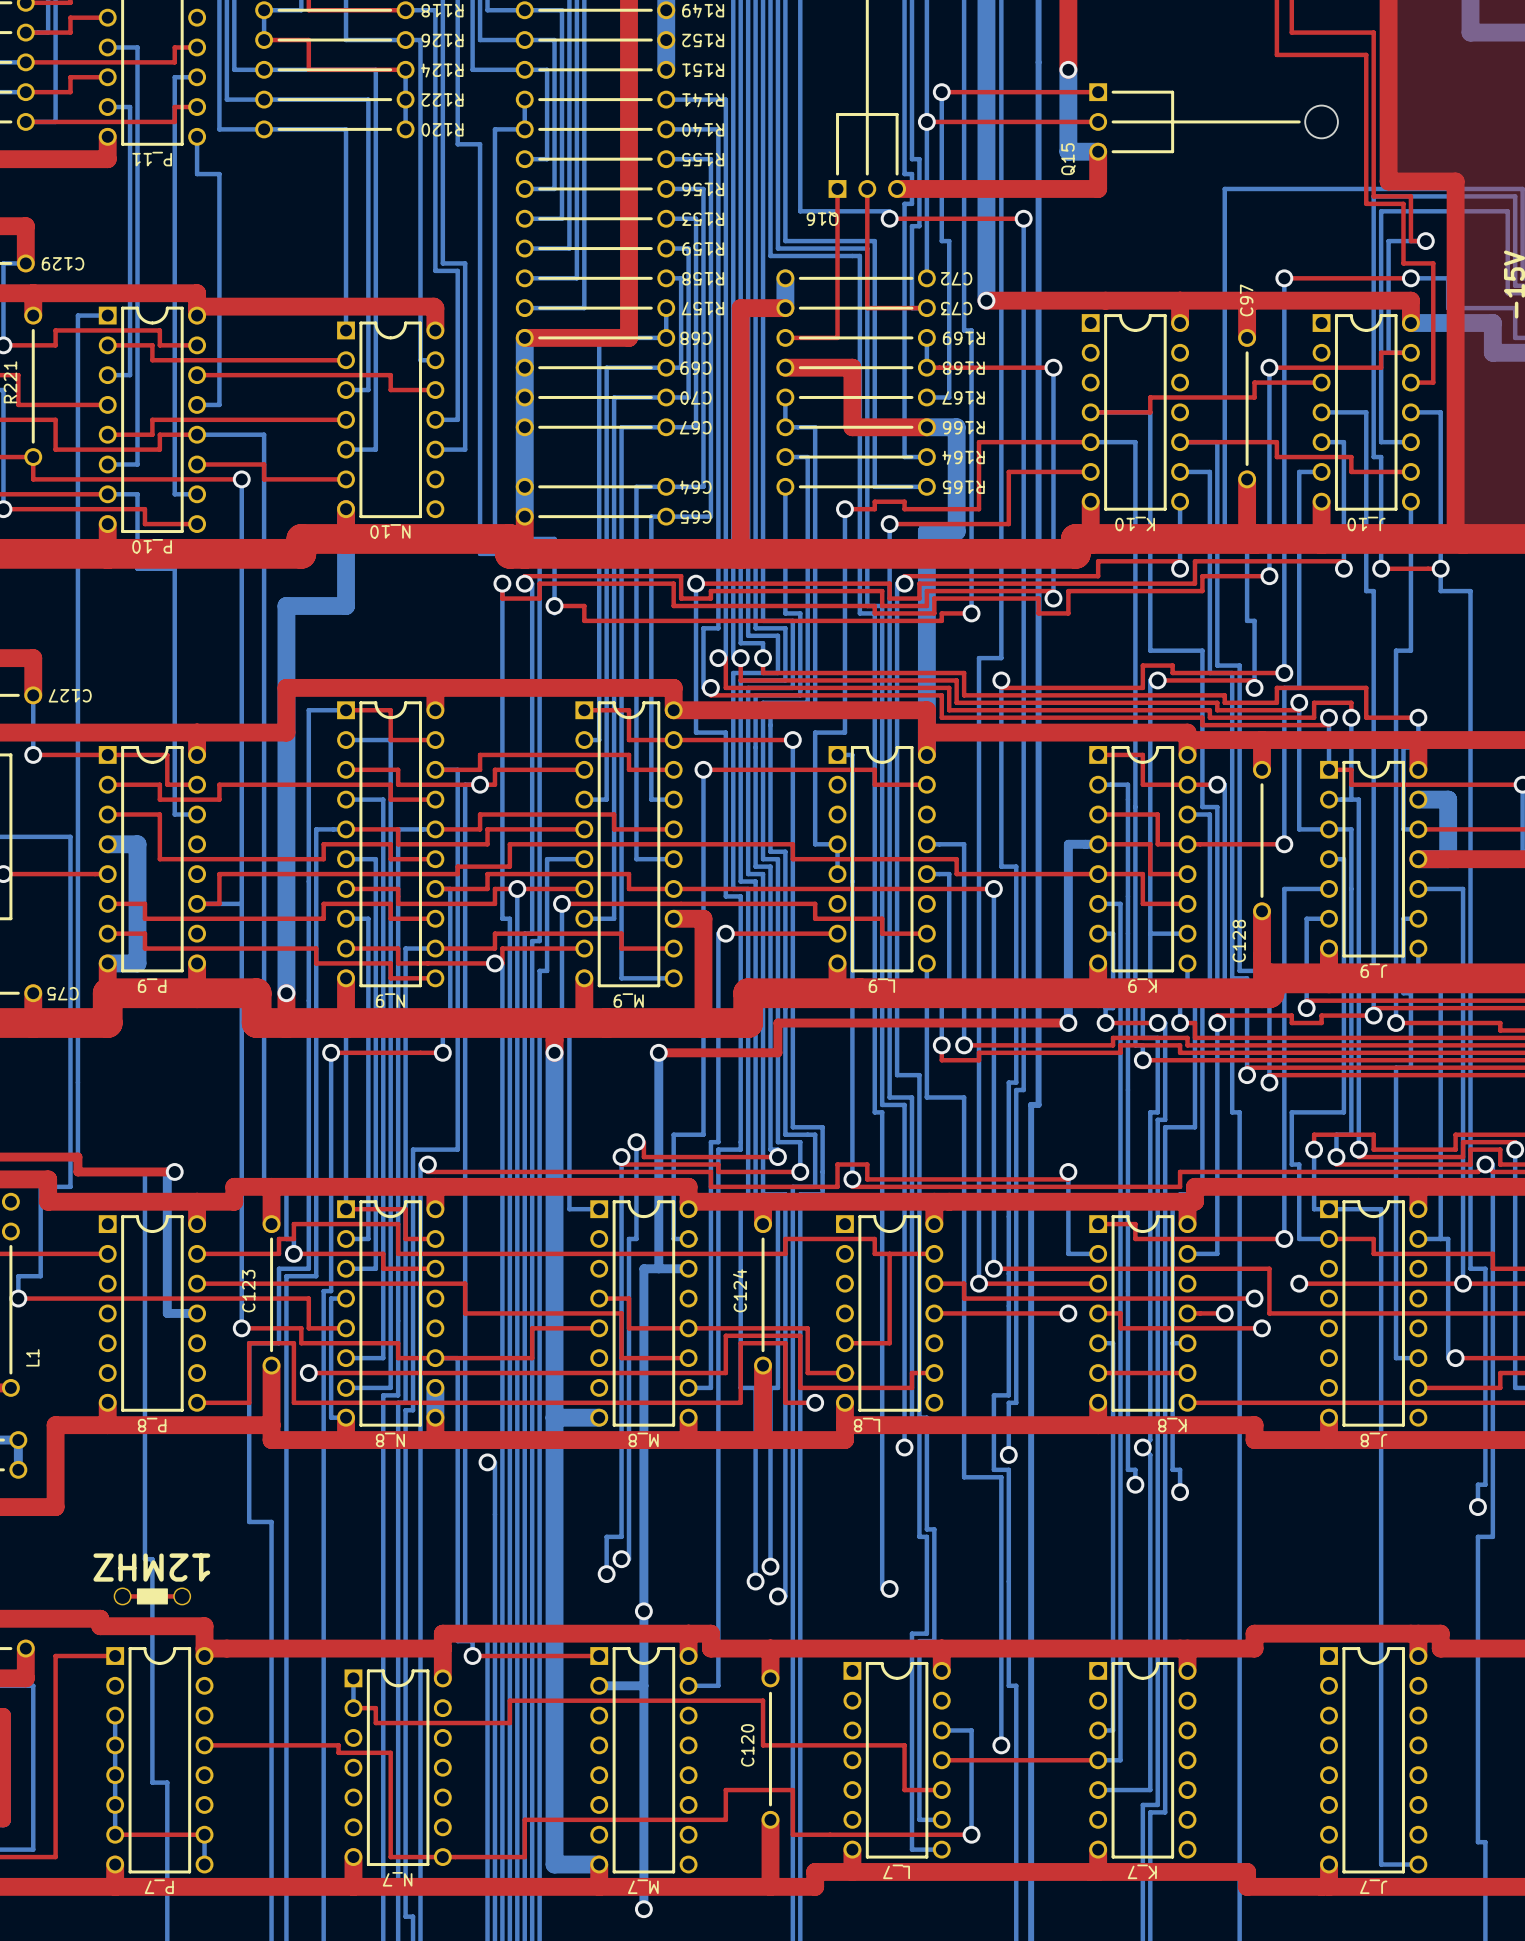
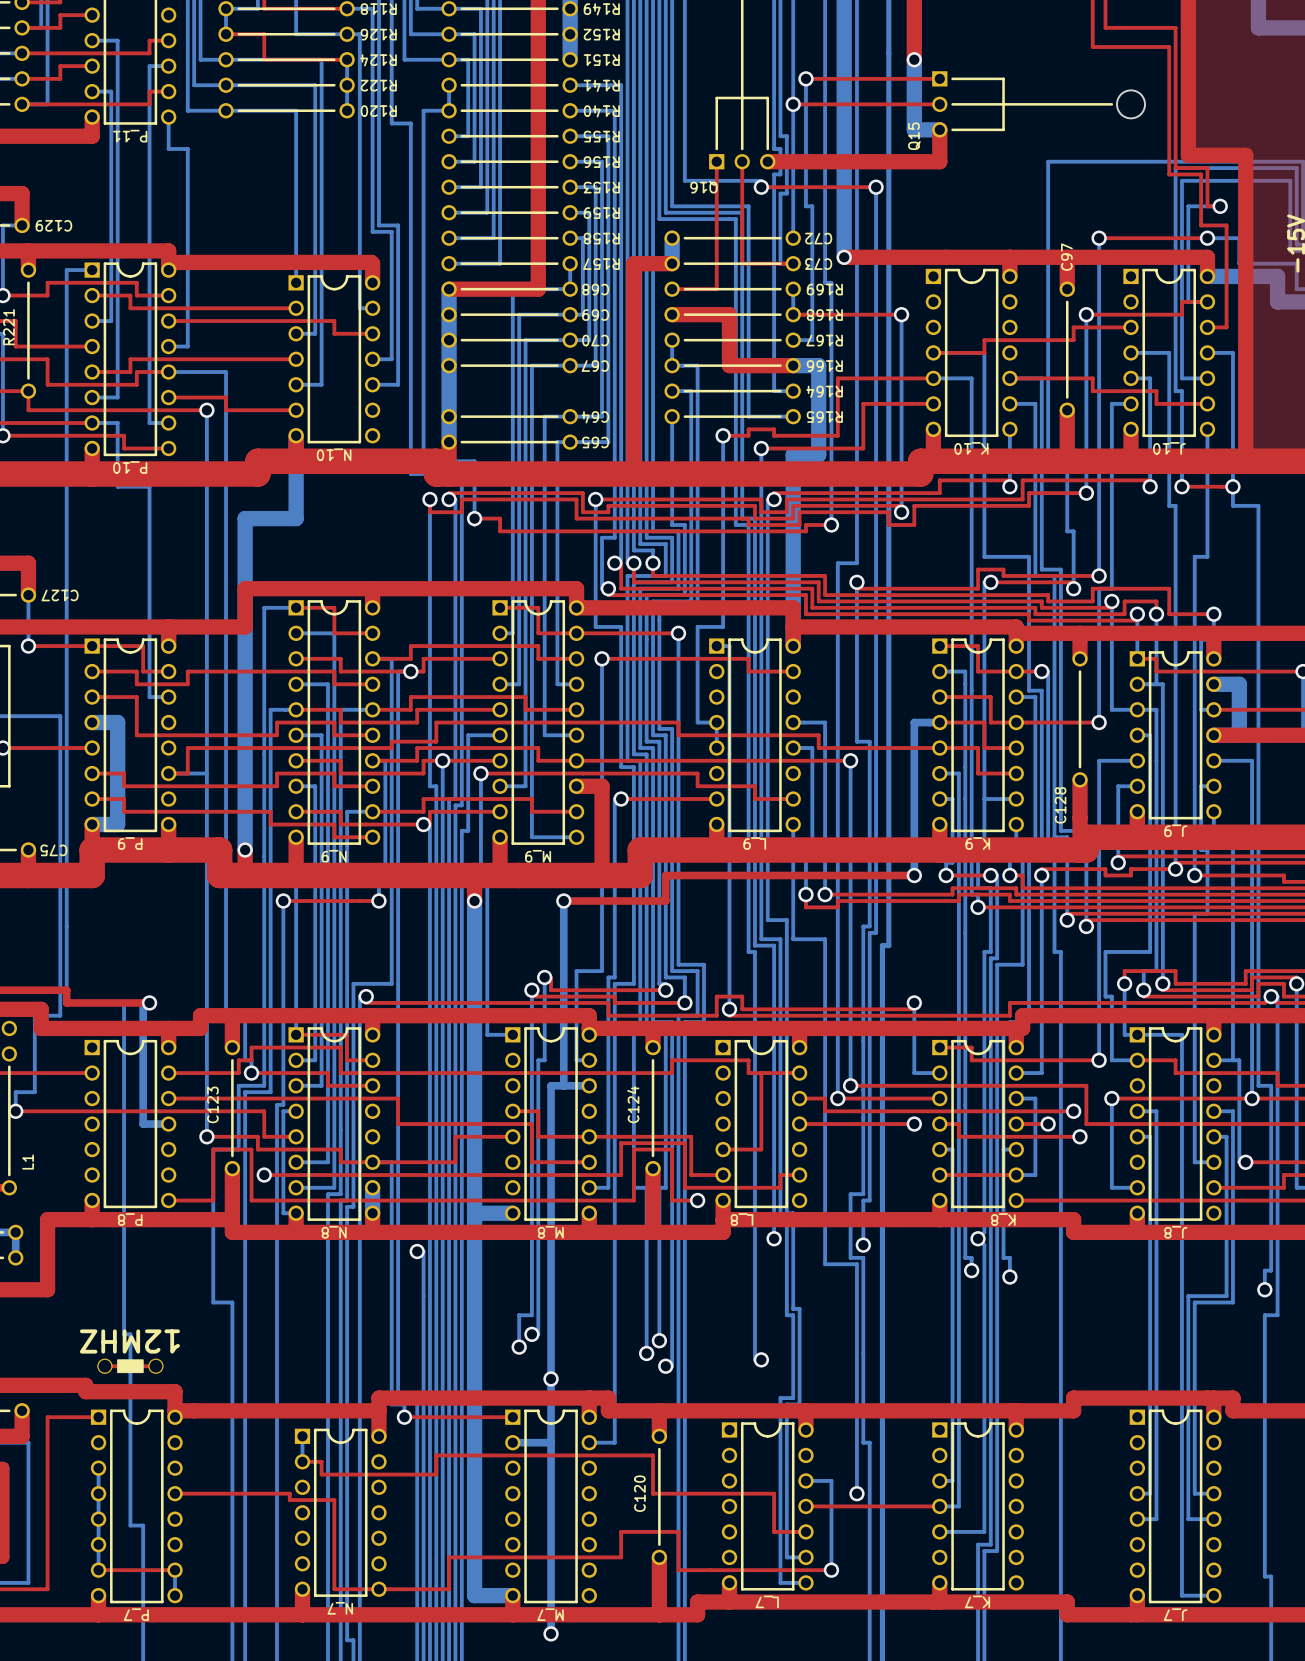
bottom track: none -> (1016, 1098) (1035, 1098) (1035, 1175) (1016, 1175)
bottom track: none -> (1111, 1098) (1111, 1187) (1137, 1187)
bottom track: none -> (1137, 1111) (1156, 1111) (1156, 1519) (1137, 1519)
bottom track: none -> (1213, 1111) (1232, 1111) (1232, 1302) (1194, 1302) (1194, 1493) (1213, 1493)
bottom track: none -> (1137, 1136) (1150, 1136) (1150, 1493) (1137, 1493)
bottom track: none -> (1213, 1136) (1226, 1136) (1226, 1296) (1188, 1296) (1188, 1519) (1213, 1519)

